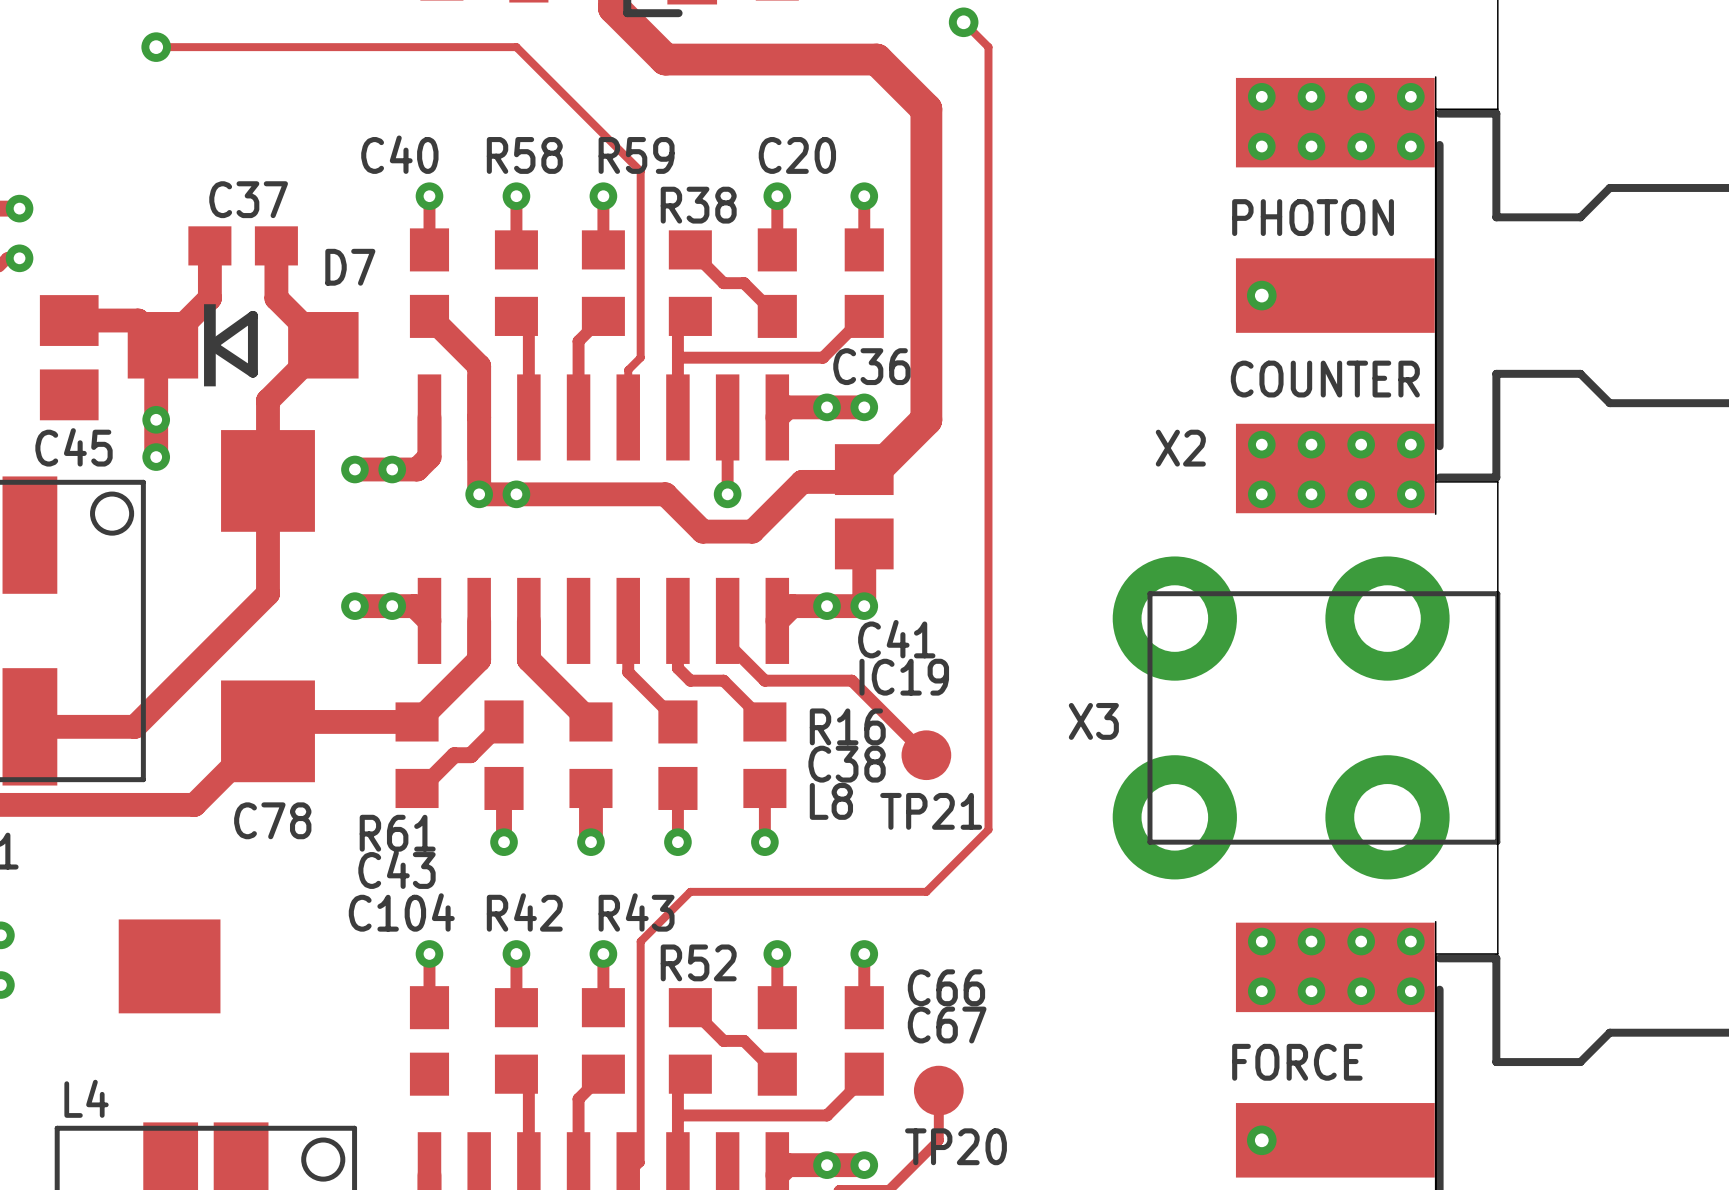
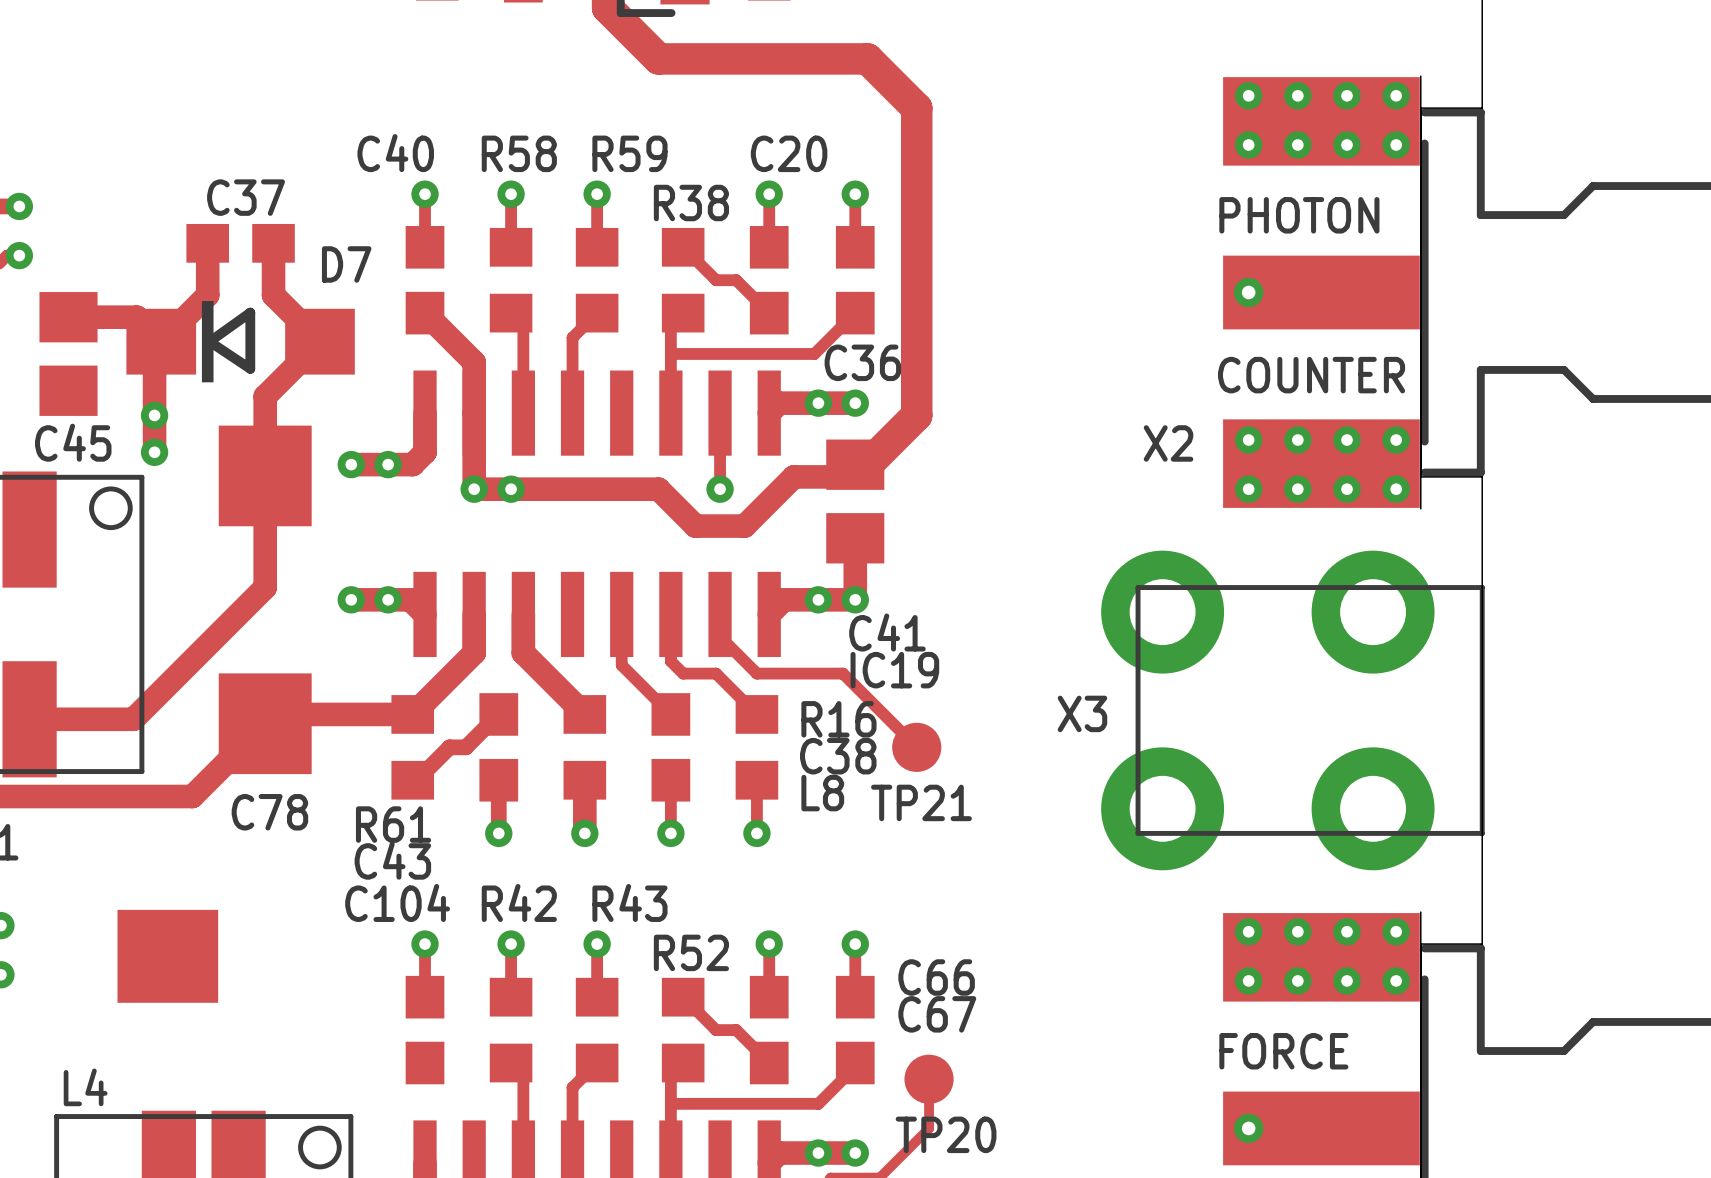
track: (963, 22) (988, 47) (988, 829) (926, 891) (690, 891) (640, 941) (640, 1162) (628, 1175) -> none
via: (963, 22) -> none
track: (156, 47) (516, 47) (640, 171) (640, 357) (628, 370) (628, 417) -> none
via: (156, 47) -> none

